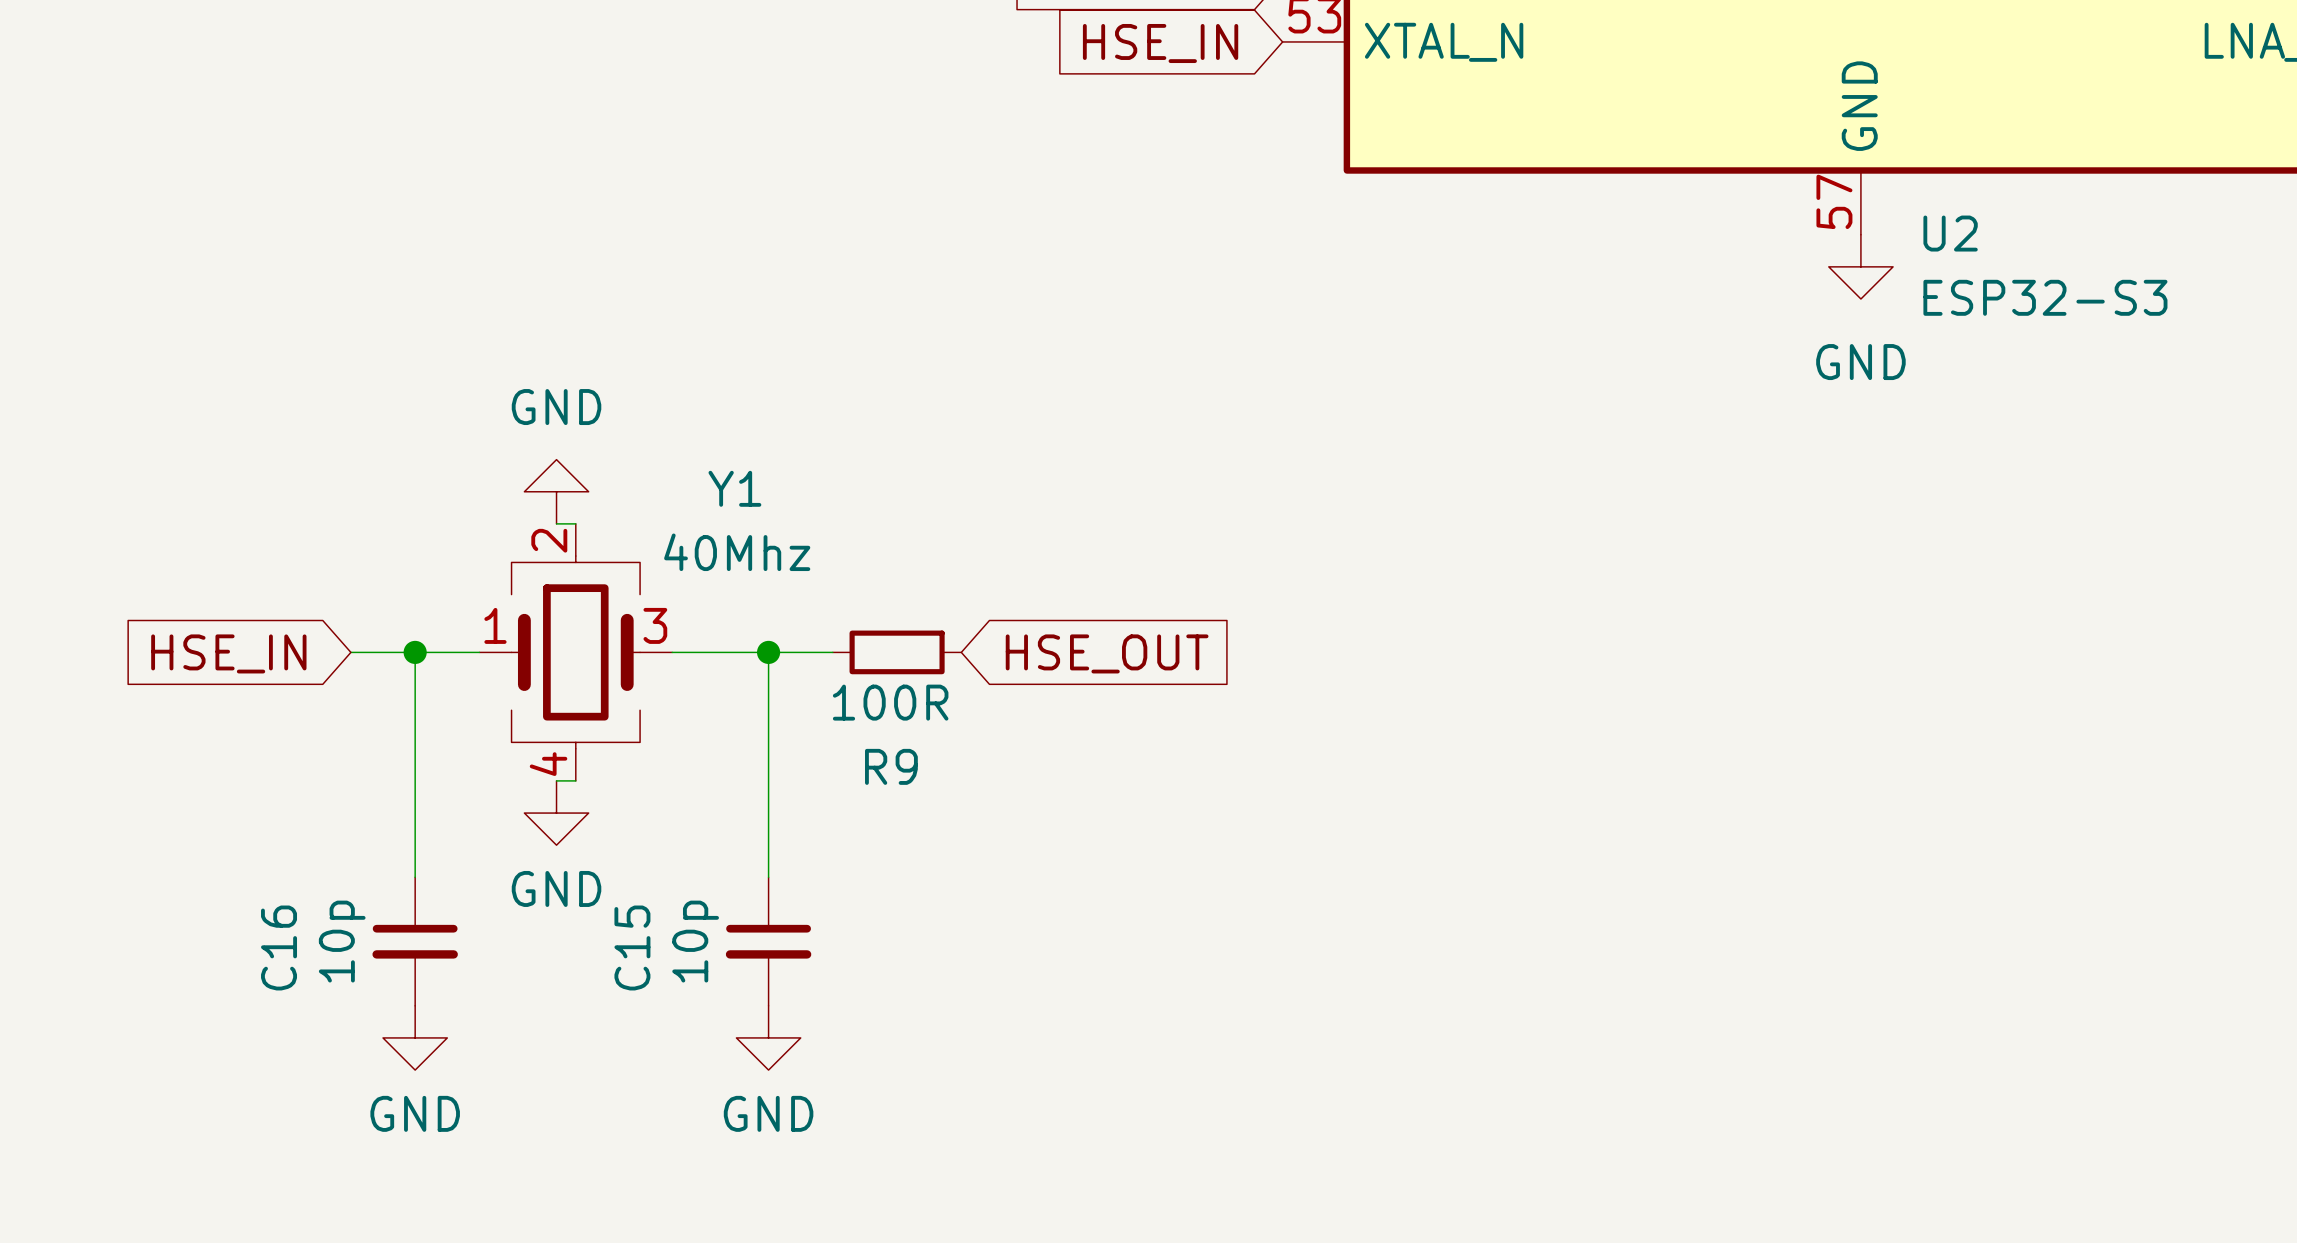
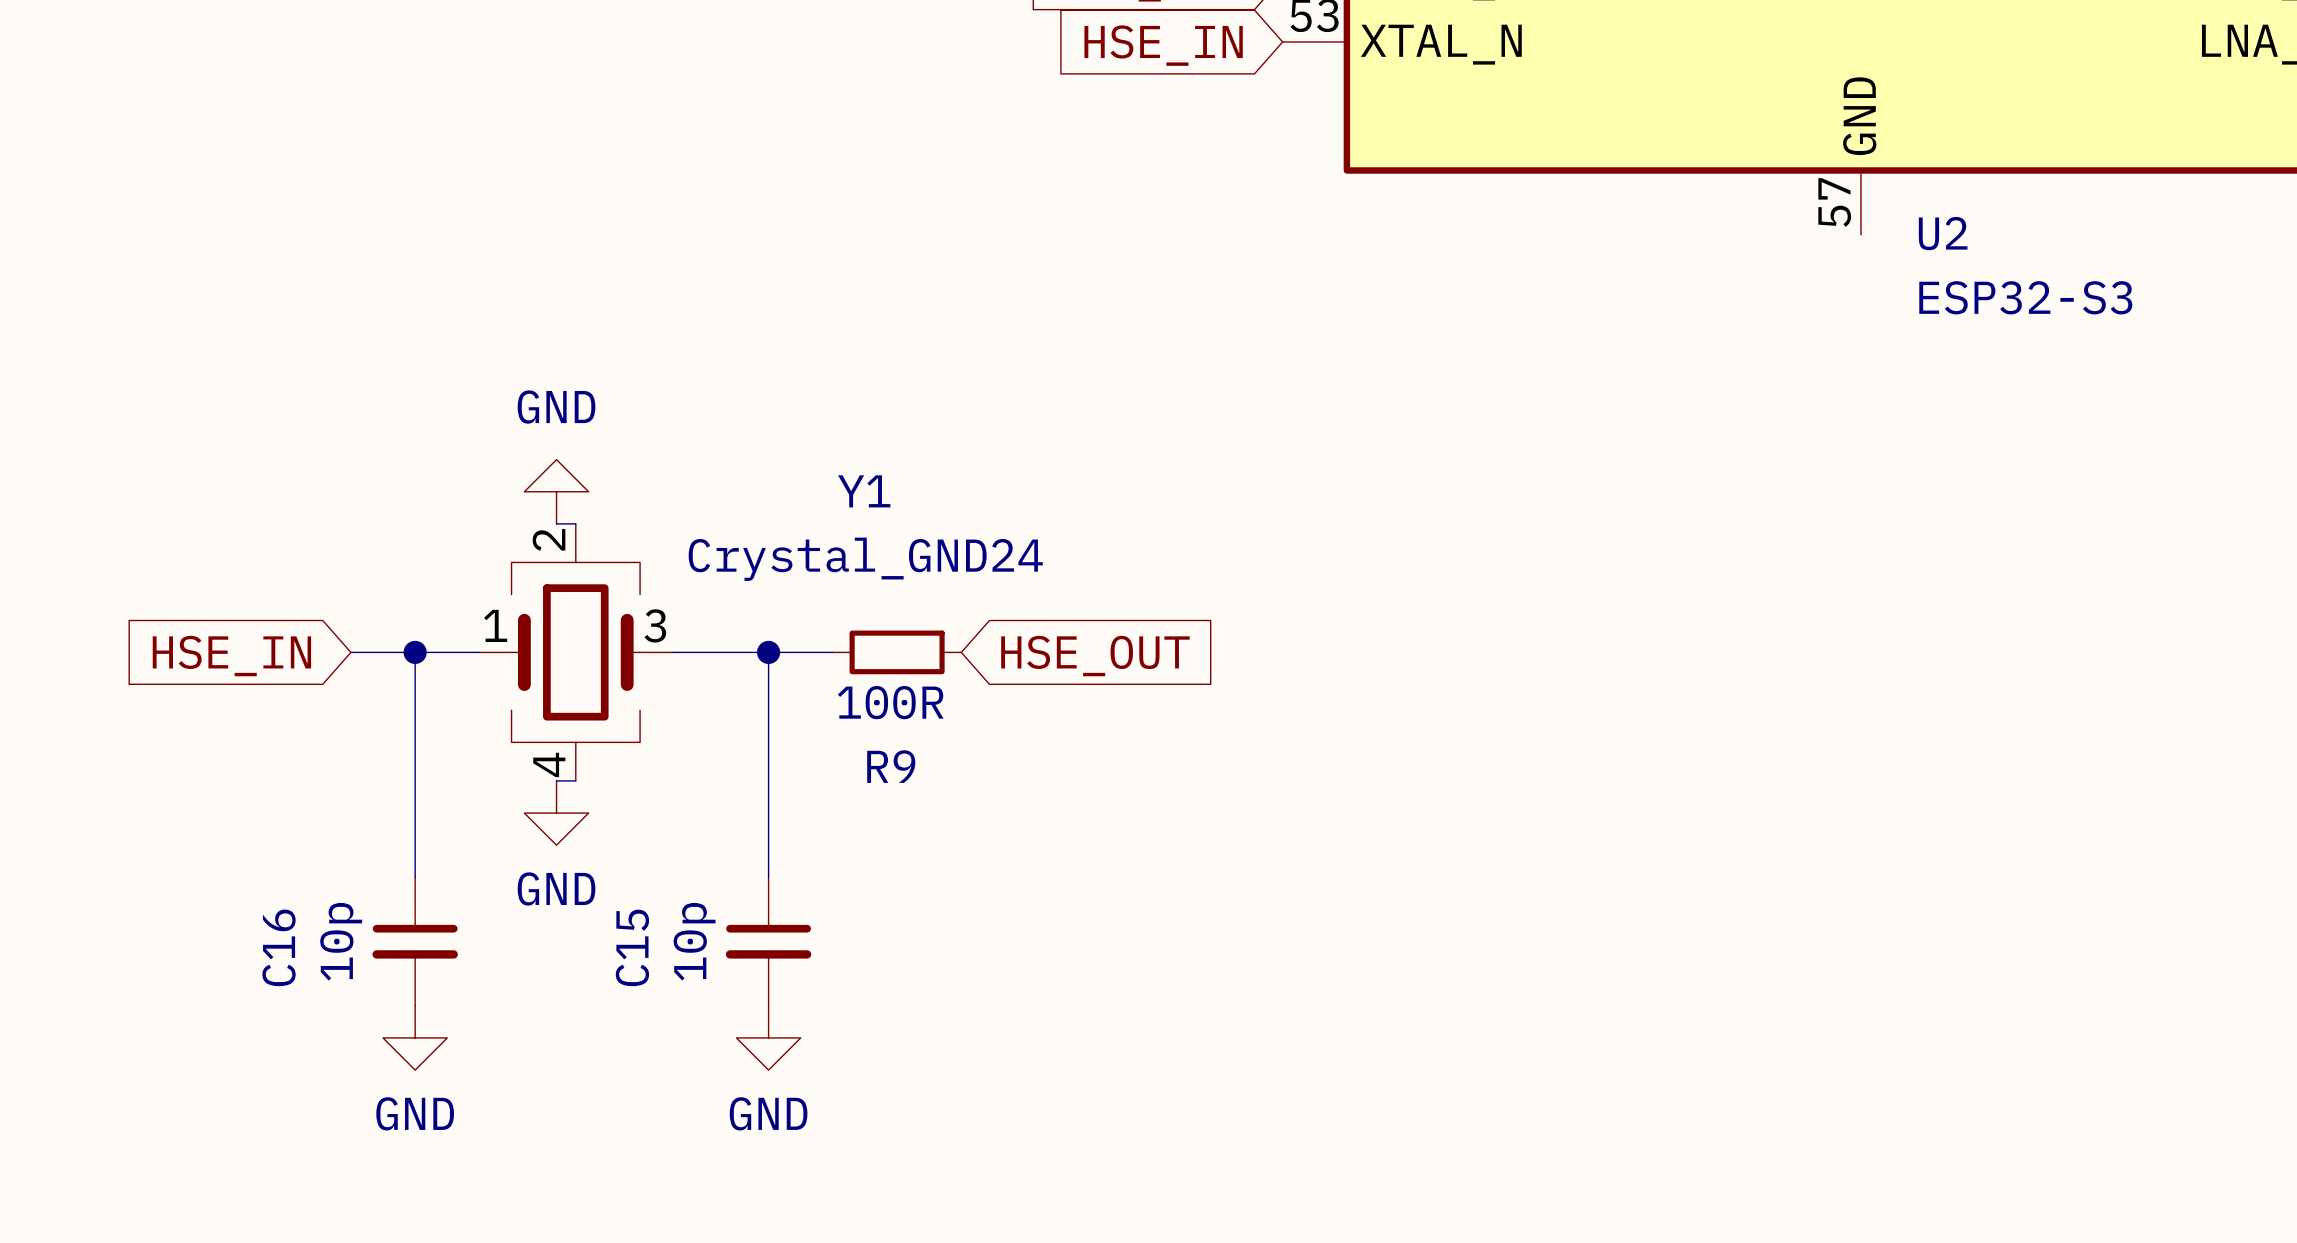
power symbol: GND (1860, 266) -> none
Y1 name position: Y1 (734, 488) -> Y1 (864, 491)
Y1 value: 40Mhz (737, 552) -> Crystal_GND24 (865, 559)

